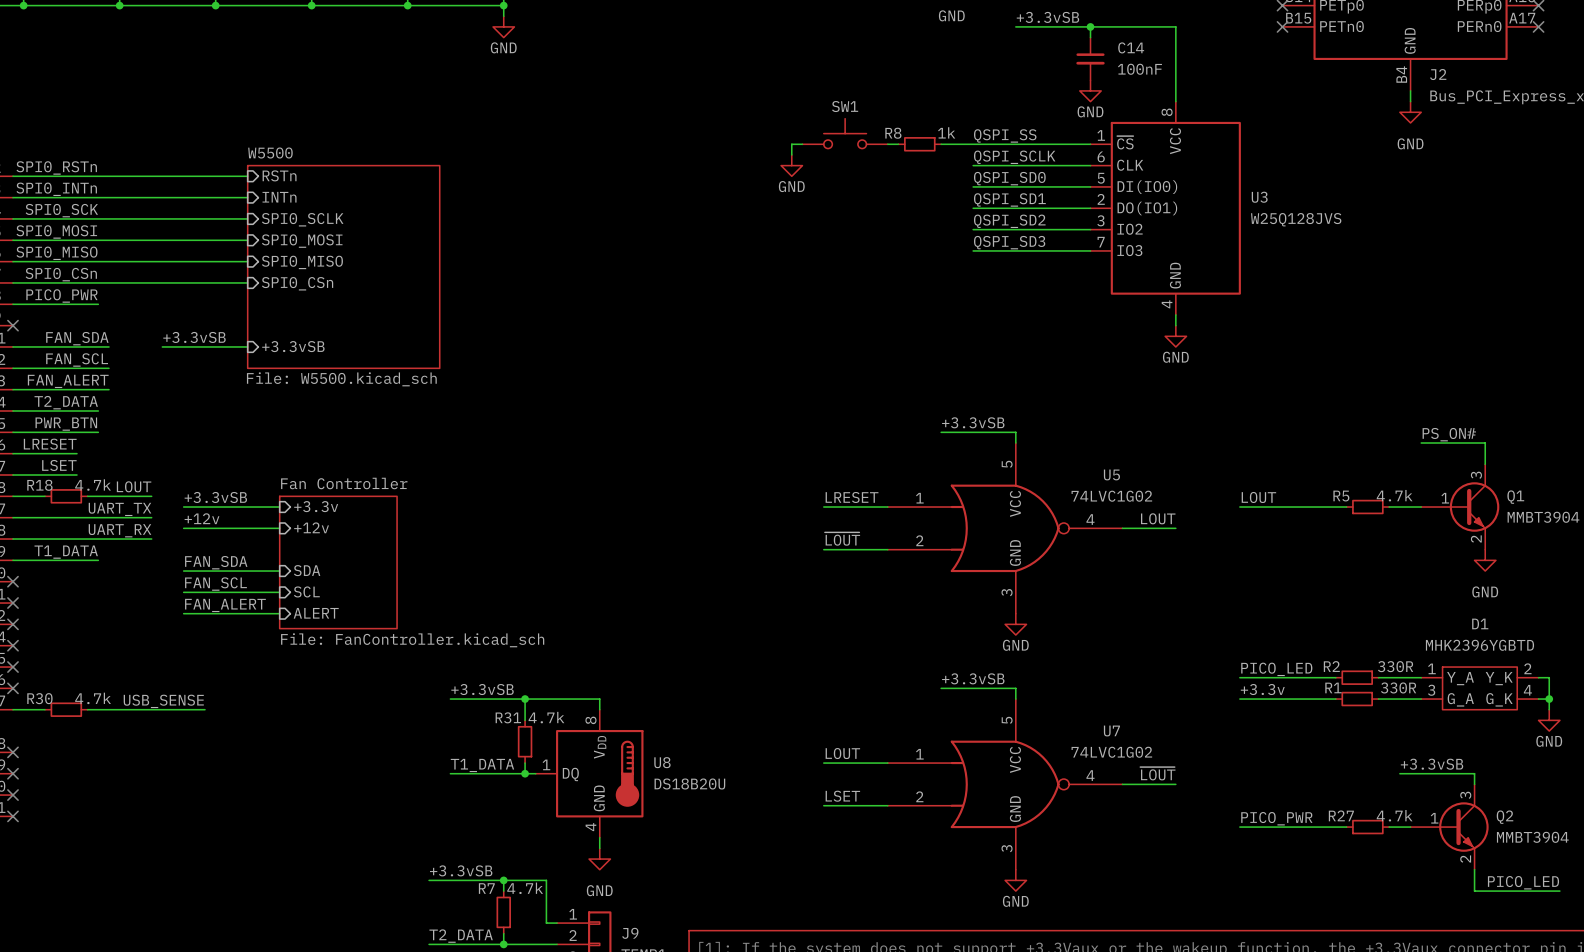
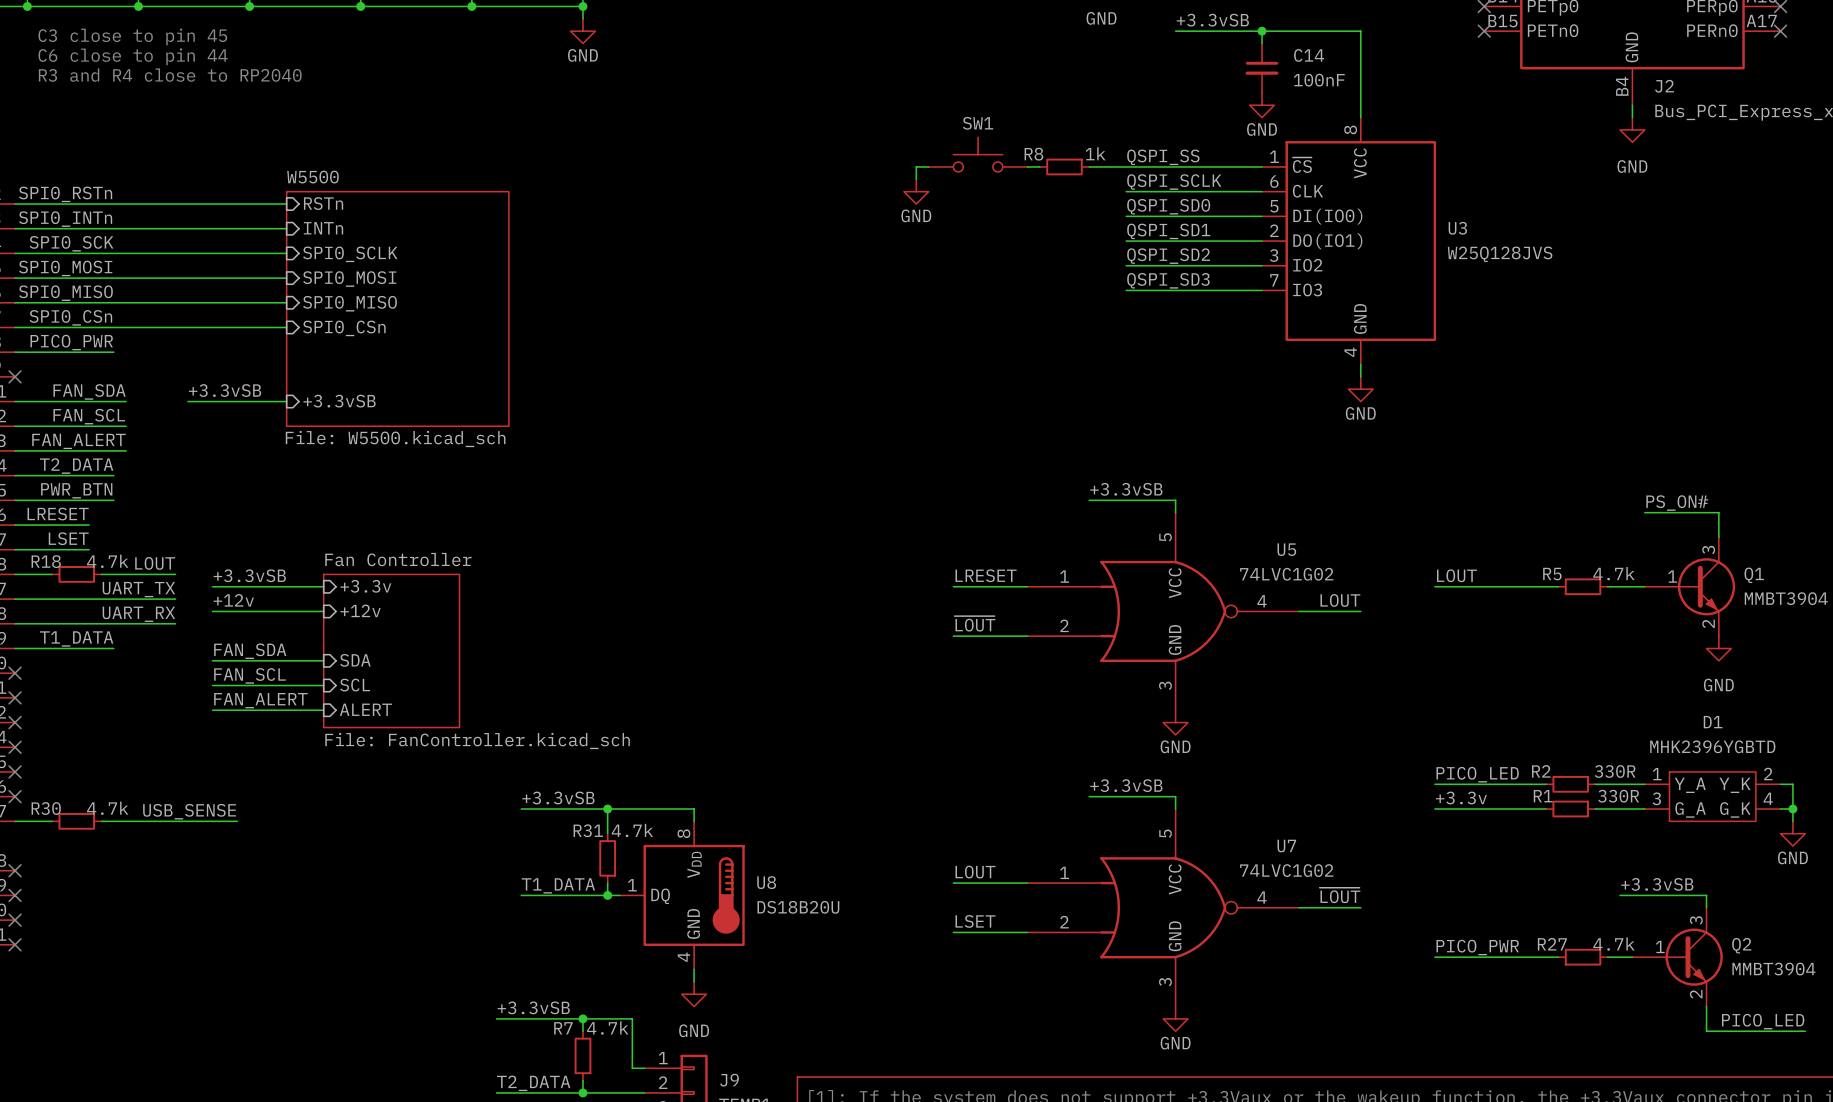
text: none -> C3 close to pin 45 (132, 36)
text: none -> C6 close to pin 44 (133, 56)
text: none -> R3 and R4 close to RP2040 (170, 75)

